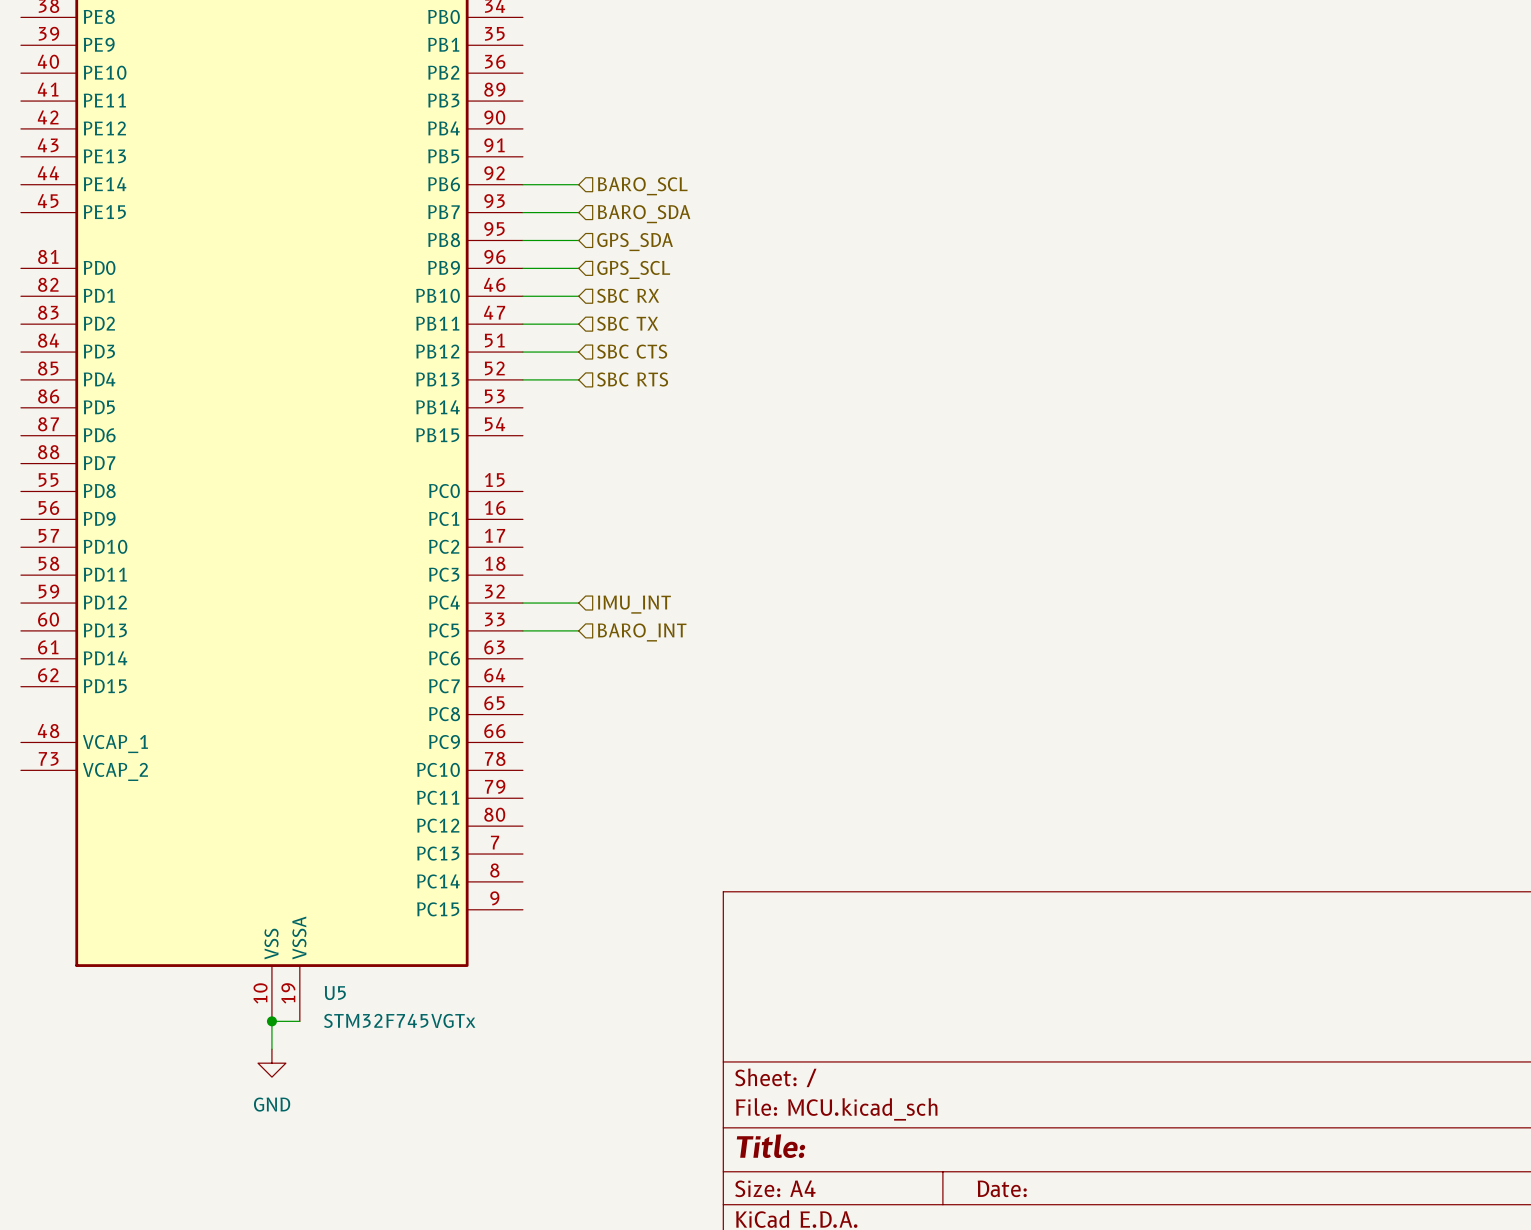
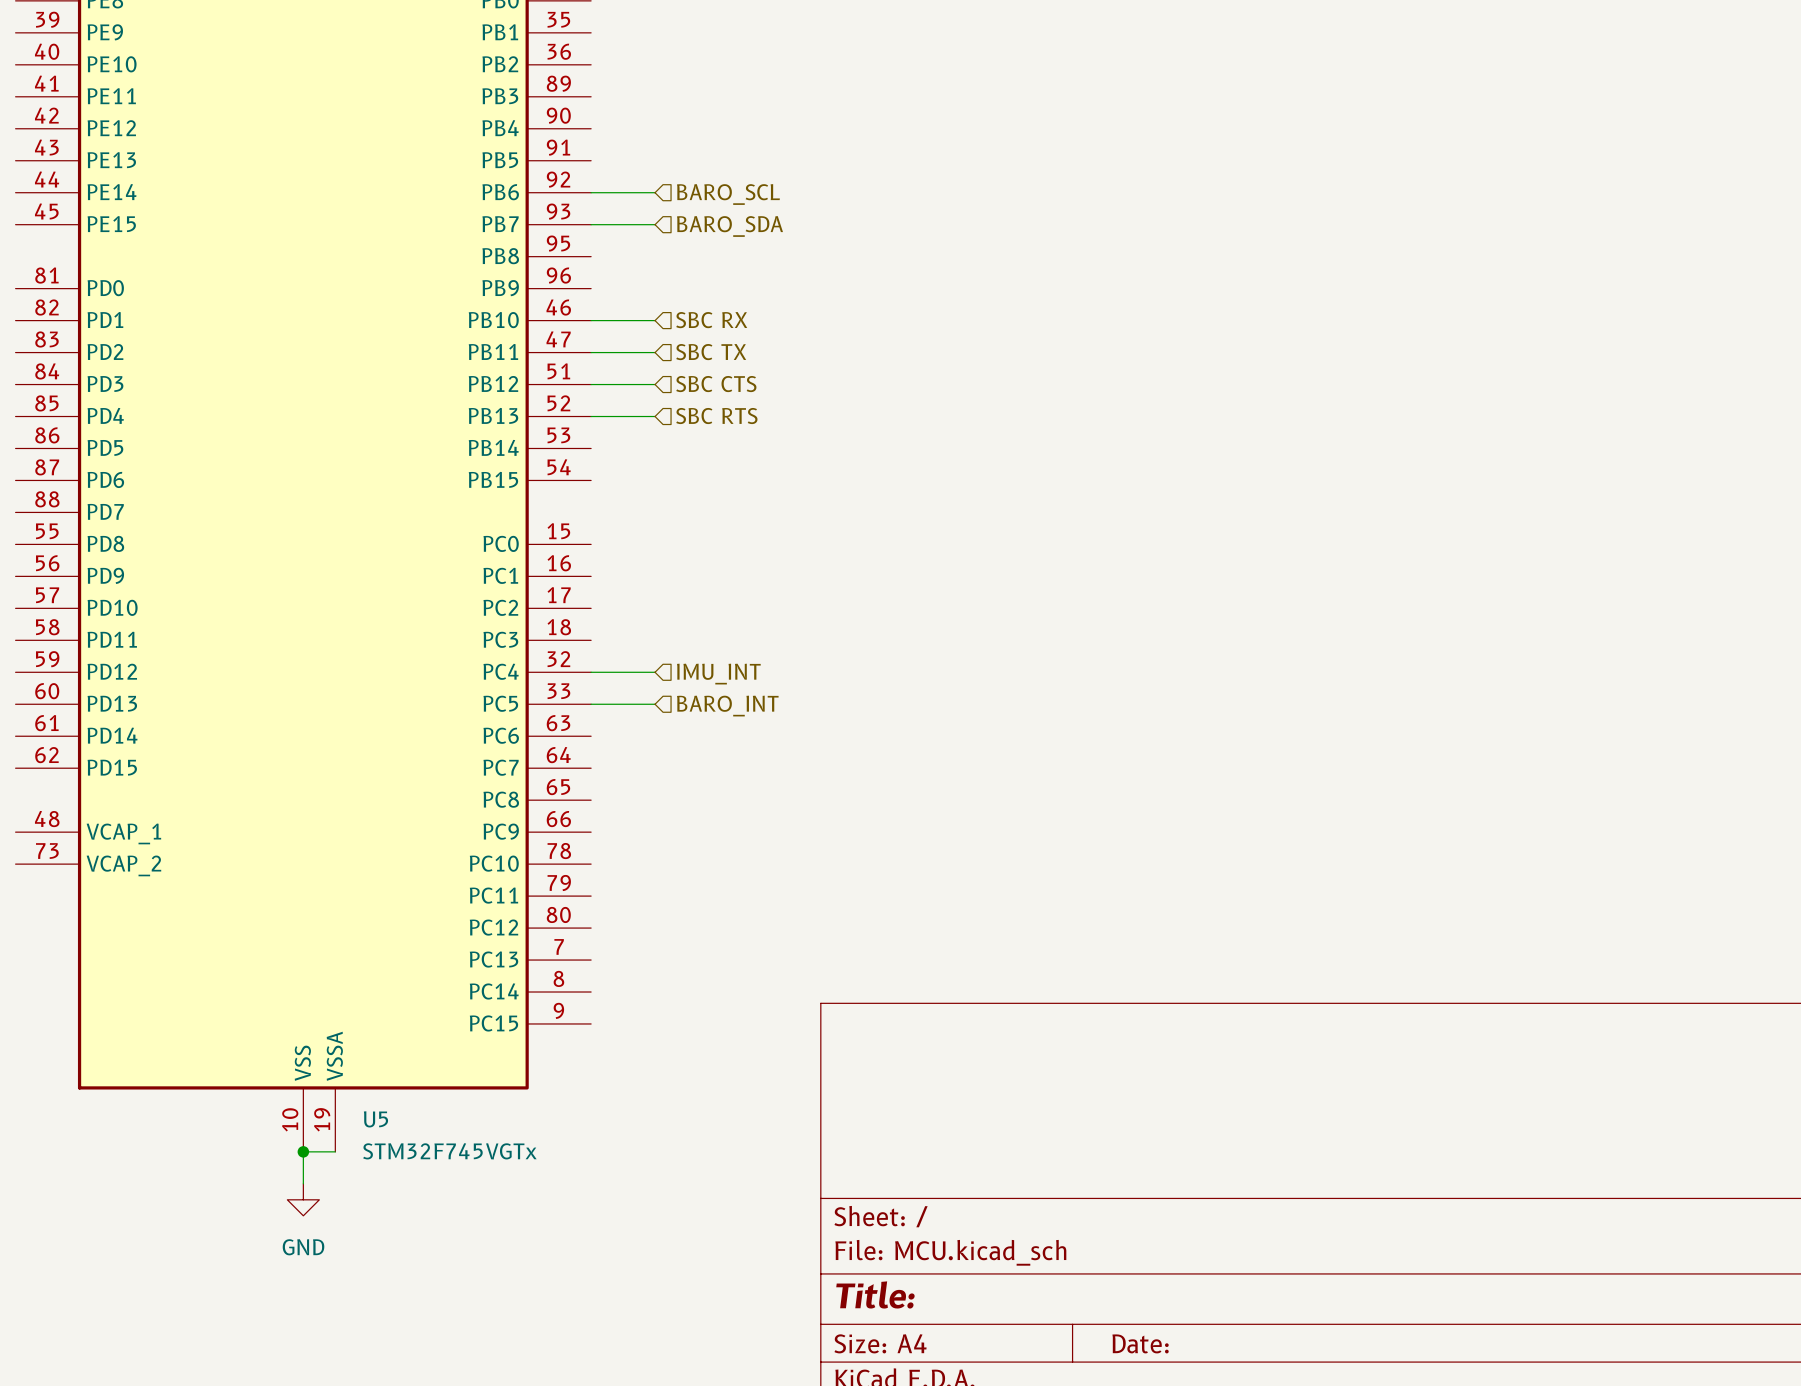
wire: (522, 240) (578, 240) -> none
hierarchical label: GPS_SDA (635, 242) -> none
wire: (522, 268) (578, 268) -> none
hierarchical label: GPS_SCL (633, 269) -> none

